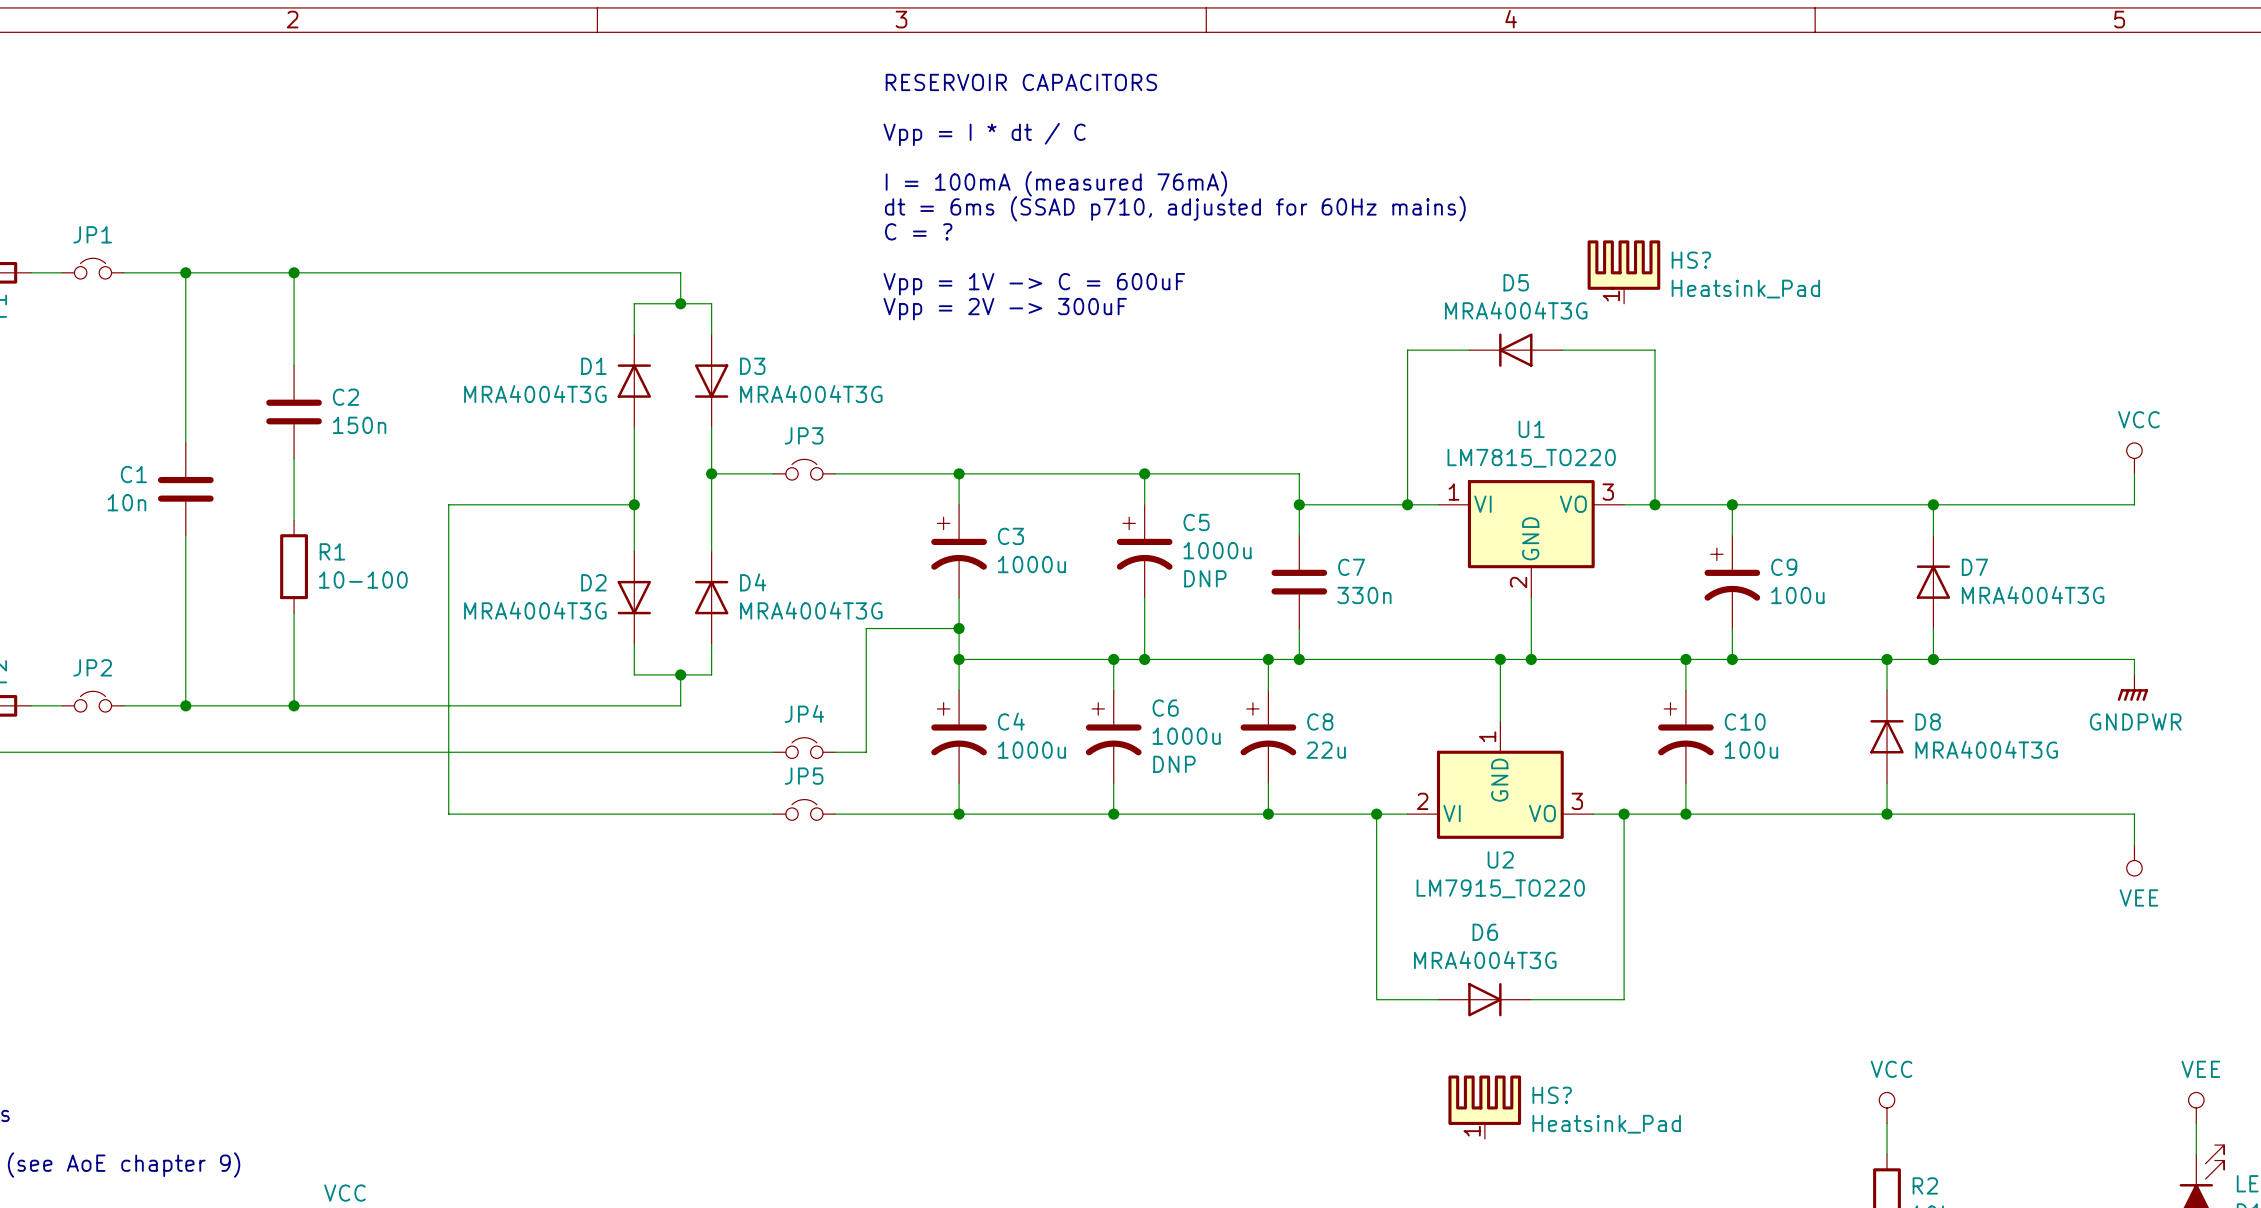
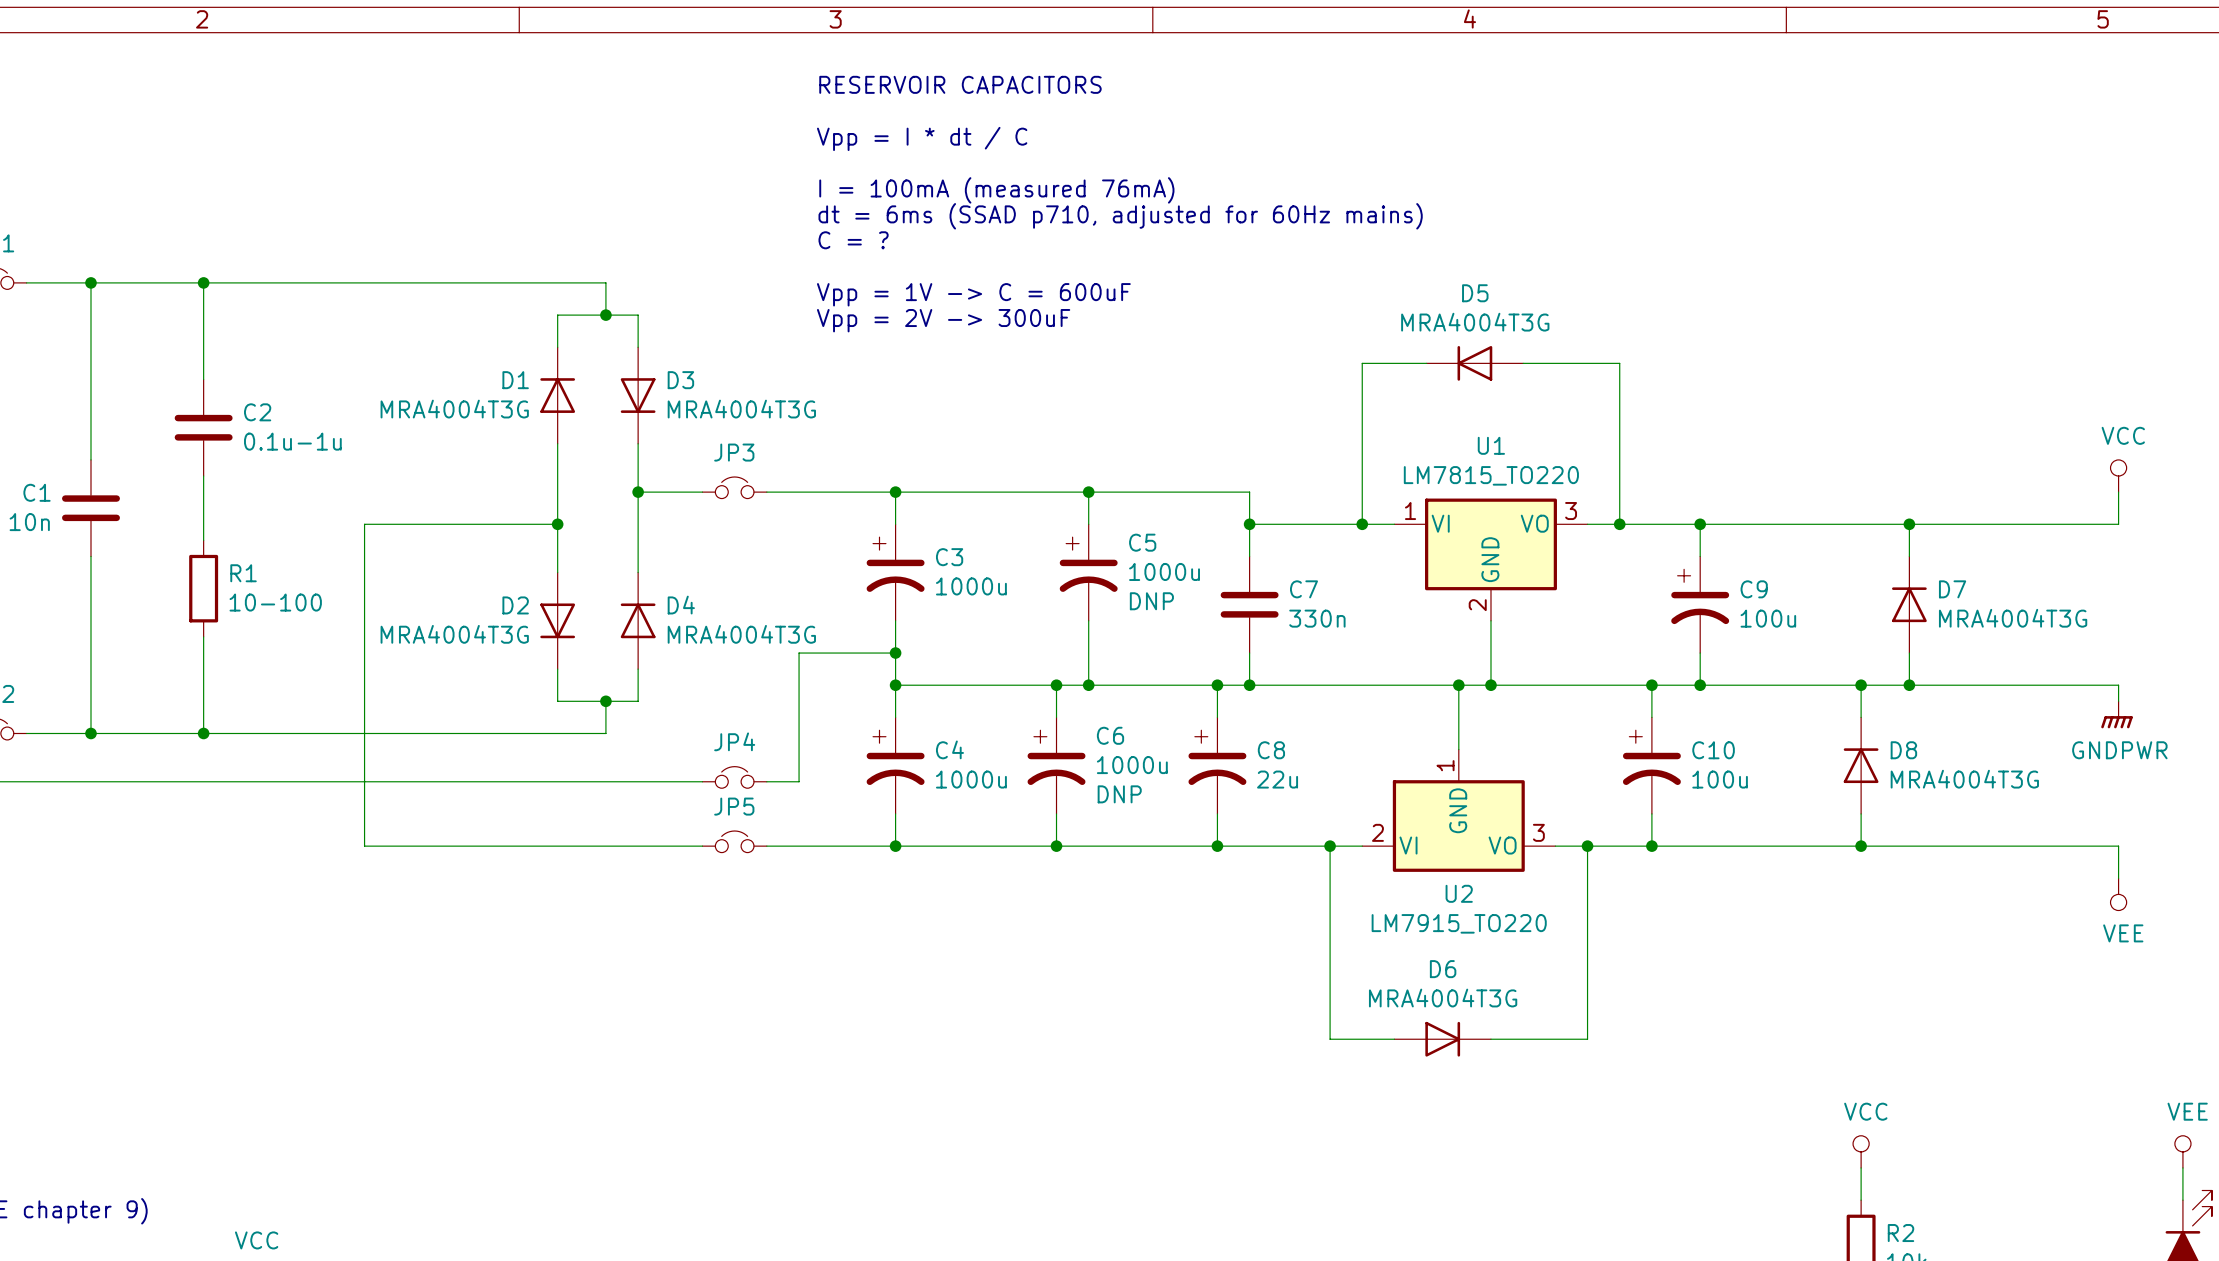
HS?: Heatsink_Pad (1623, 272) -> none
C2 value: 150n (359, 425) -> 0.1u-1u (292, 441)
HS?: Heatsink_Pad (1484, 1107) -> none

